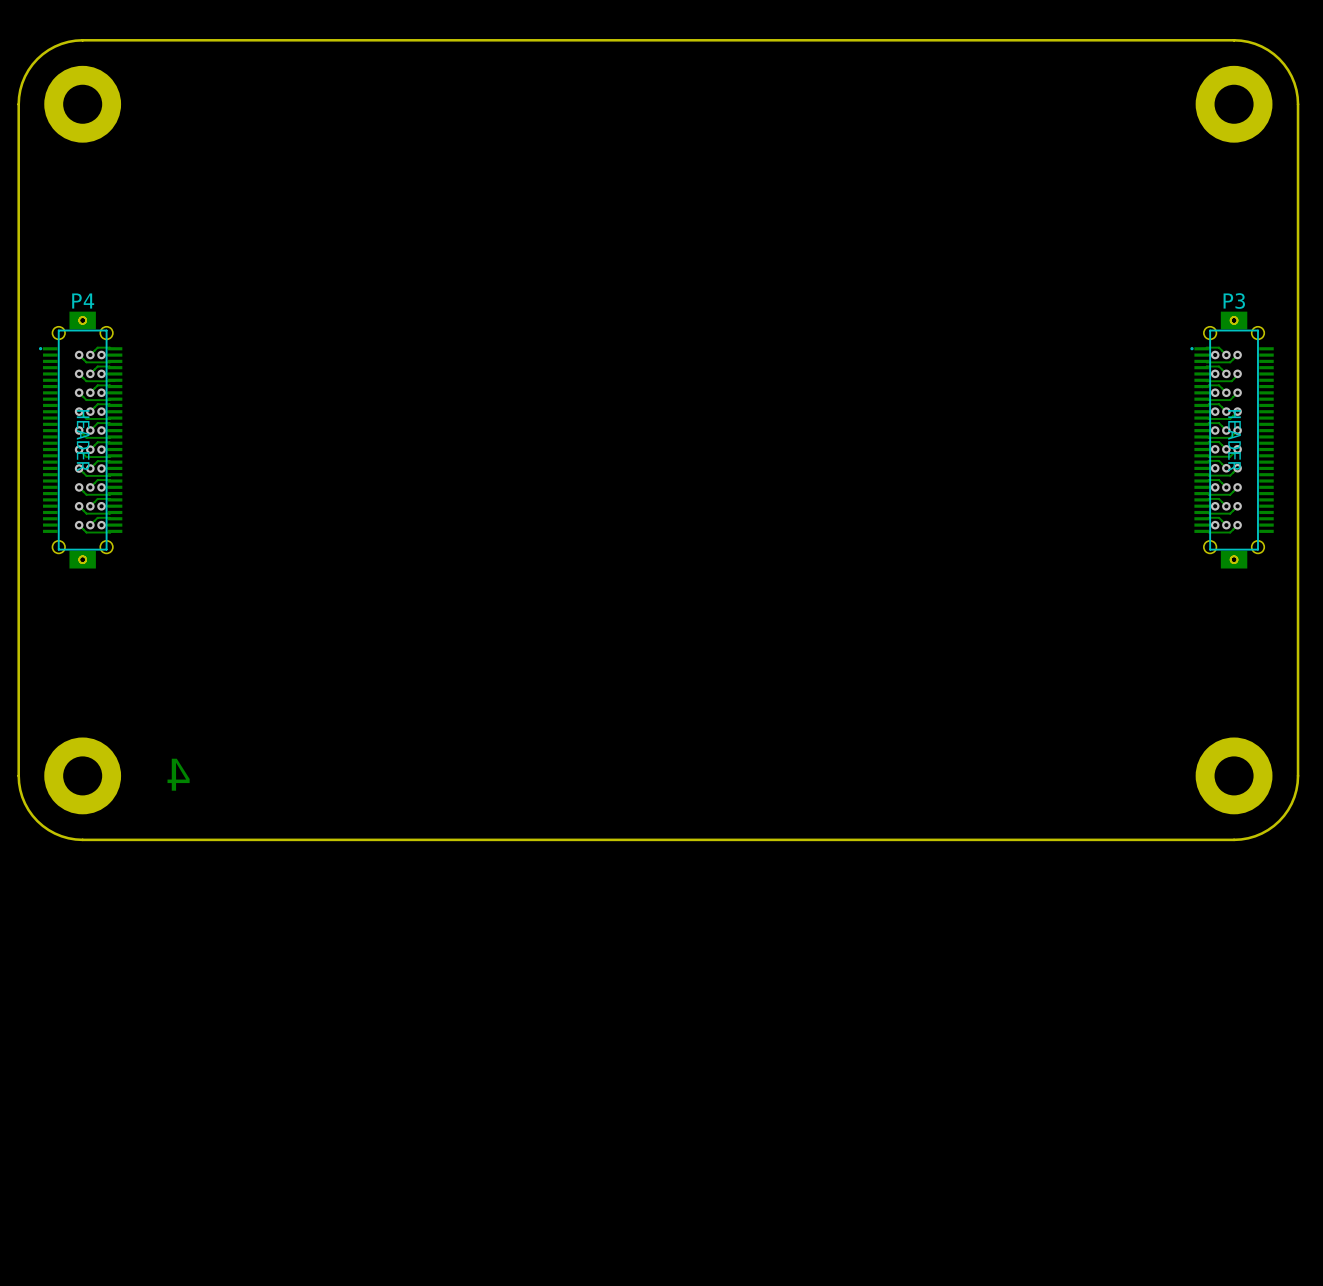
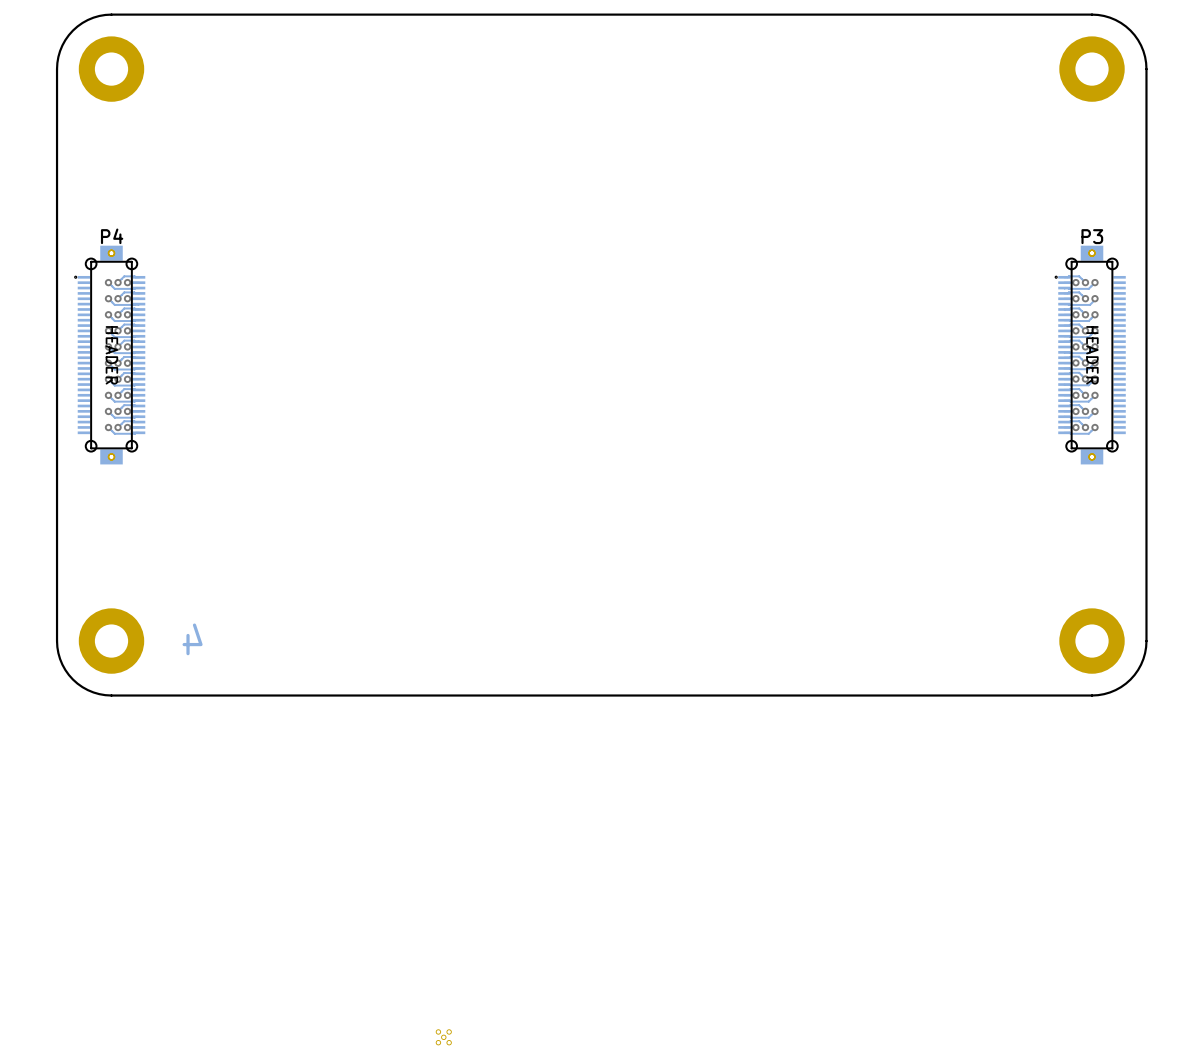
part: none -> (443, 1037)

